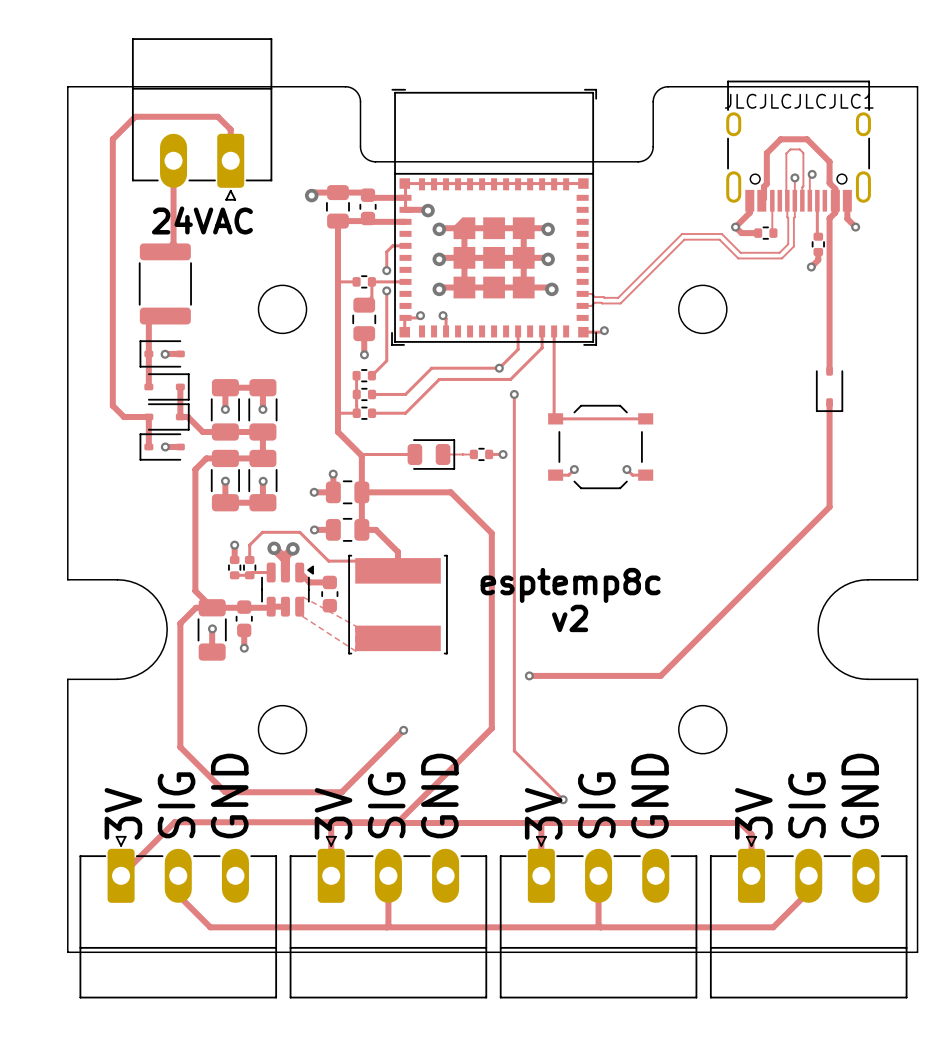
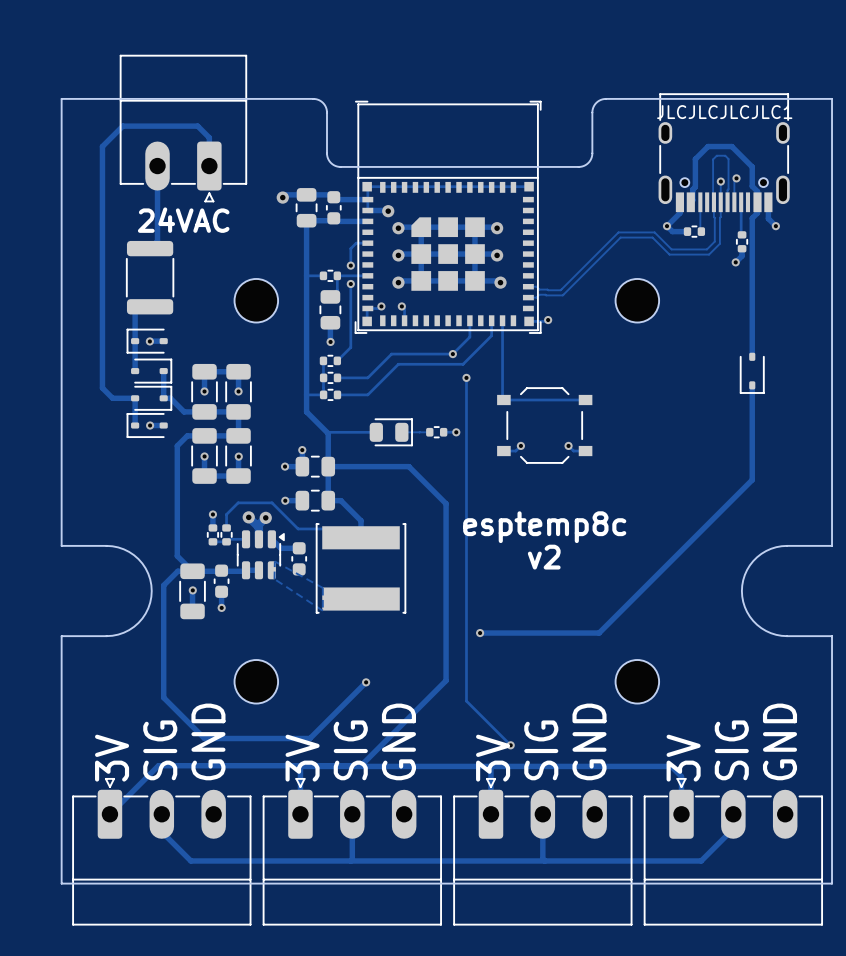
text position: esptemp8c (570, 585) -> esptemp8c (544, 527)
text position: v2 (570, 618) -> v2 (544, 557)

